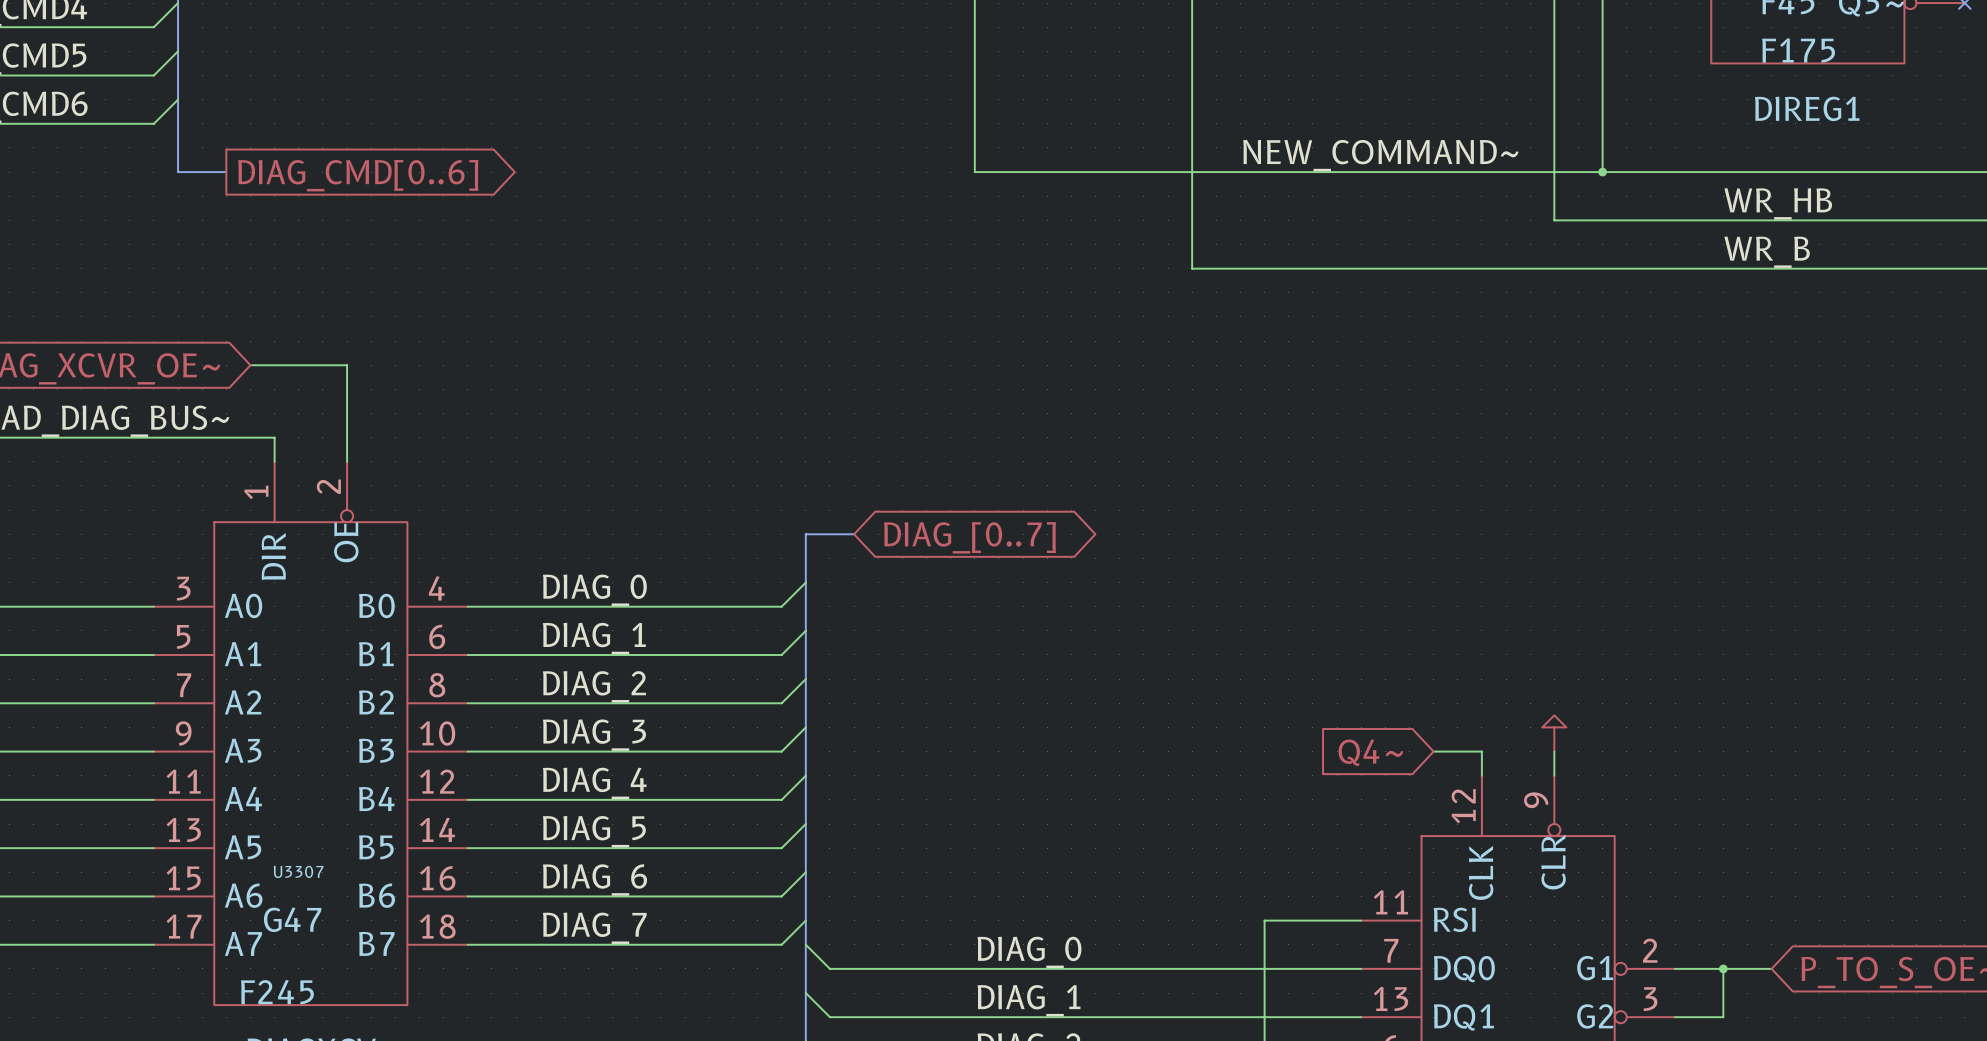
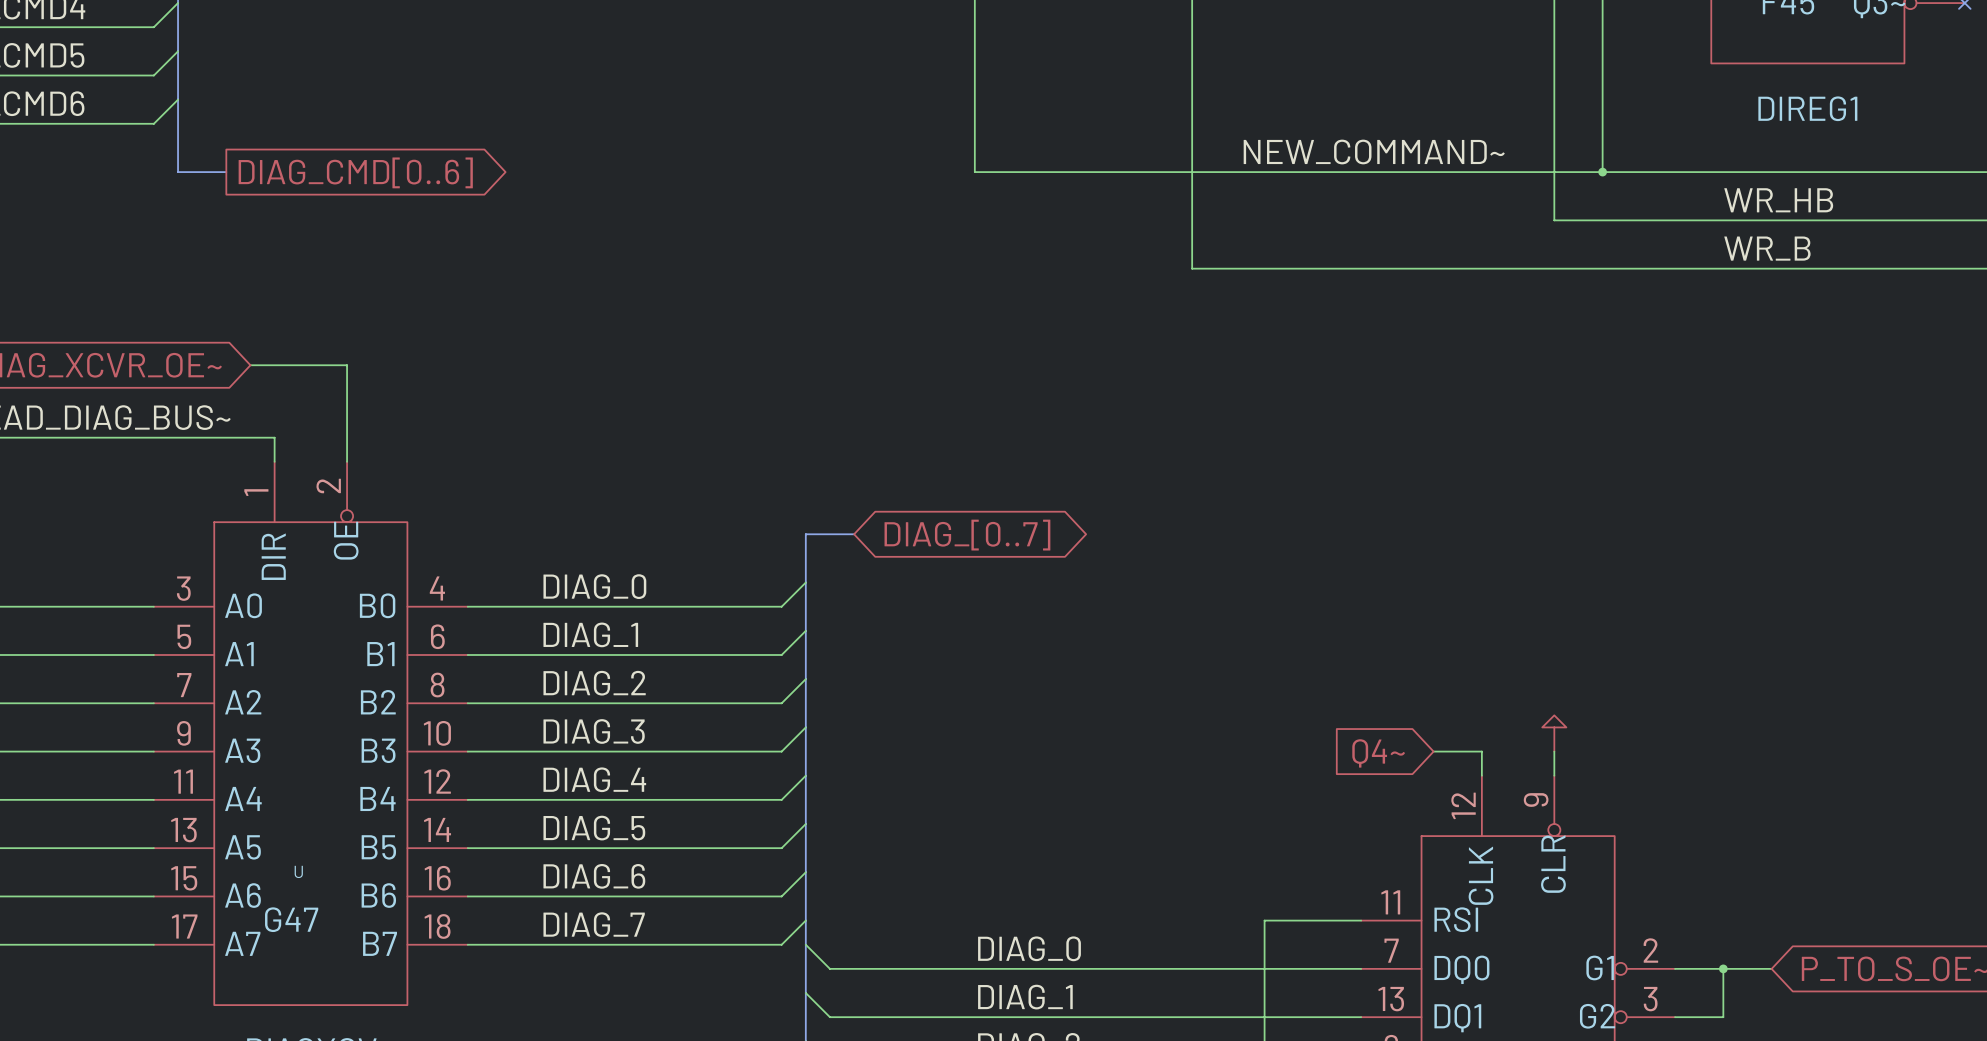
part value: F175 (1798, 50) -> none
U3307 name: U3307 (298, 871) -> U (298, 871)
U3307 value: F245 (277, 992) -> none

